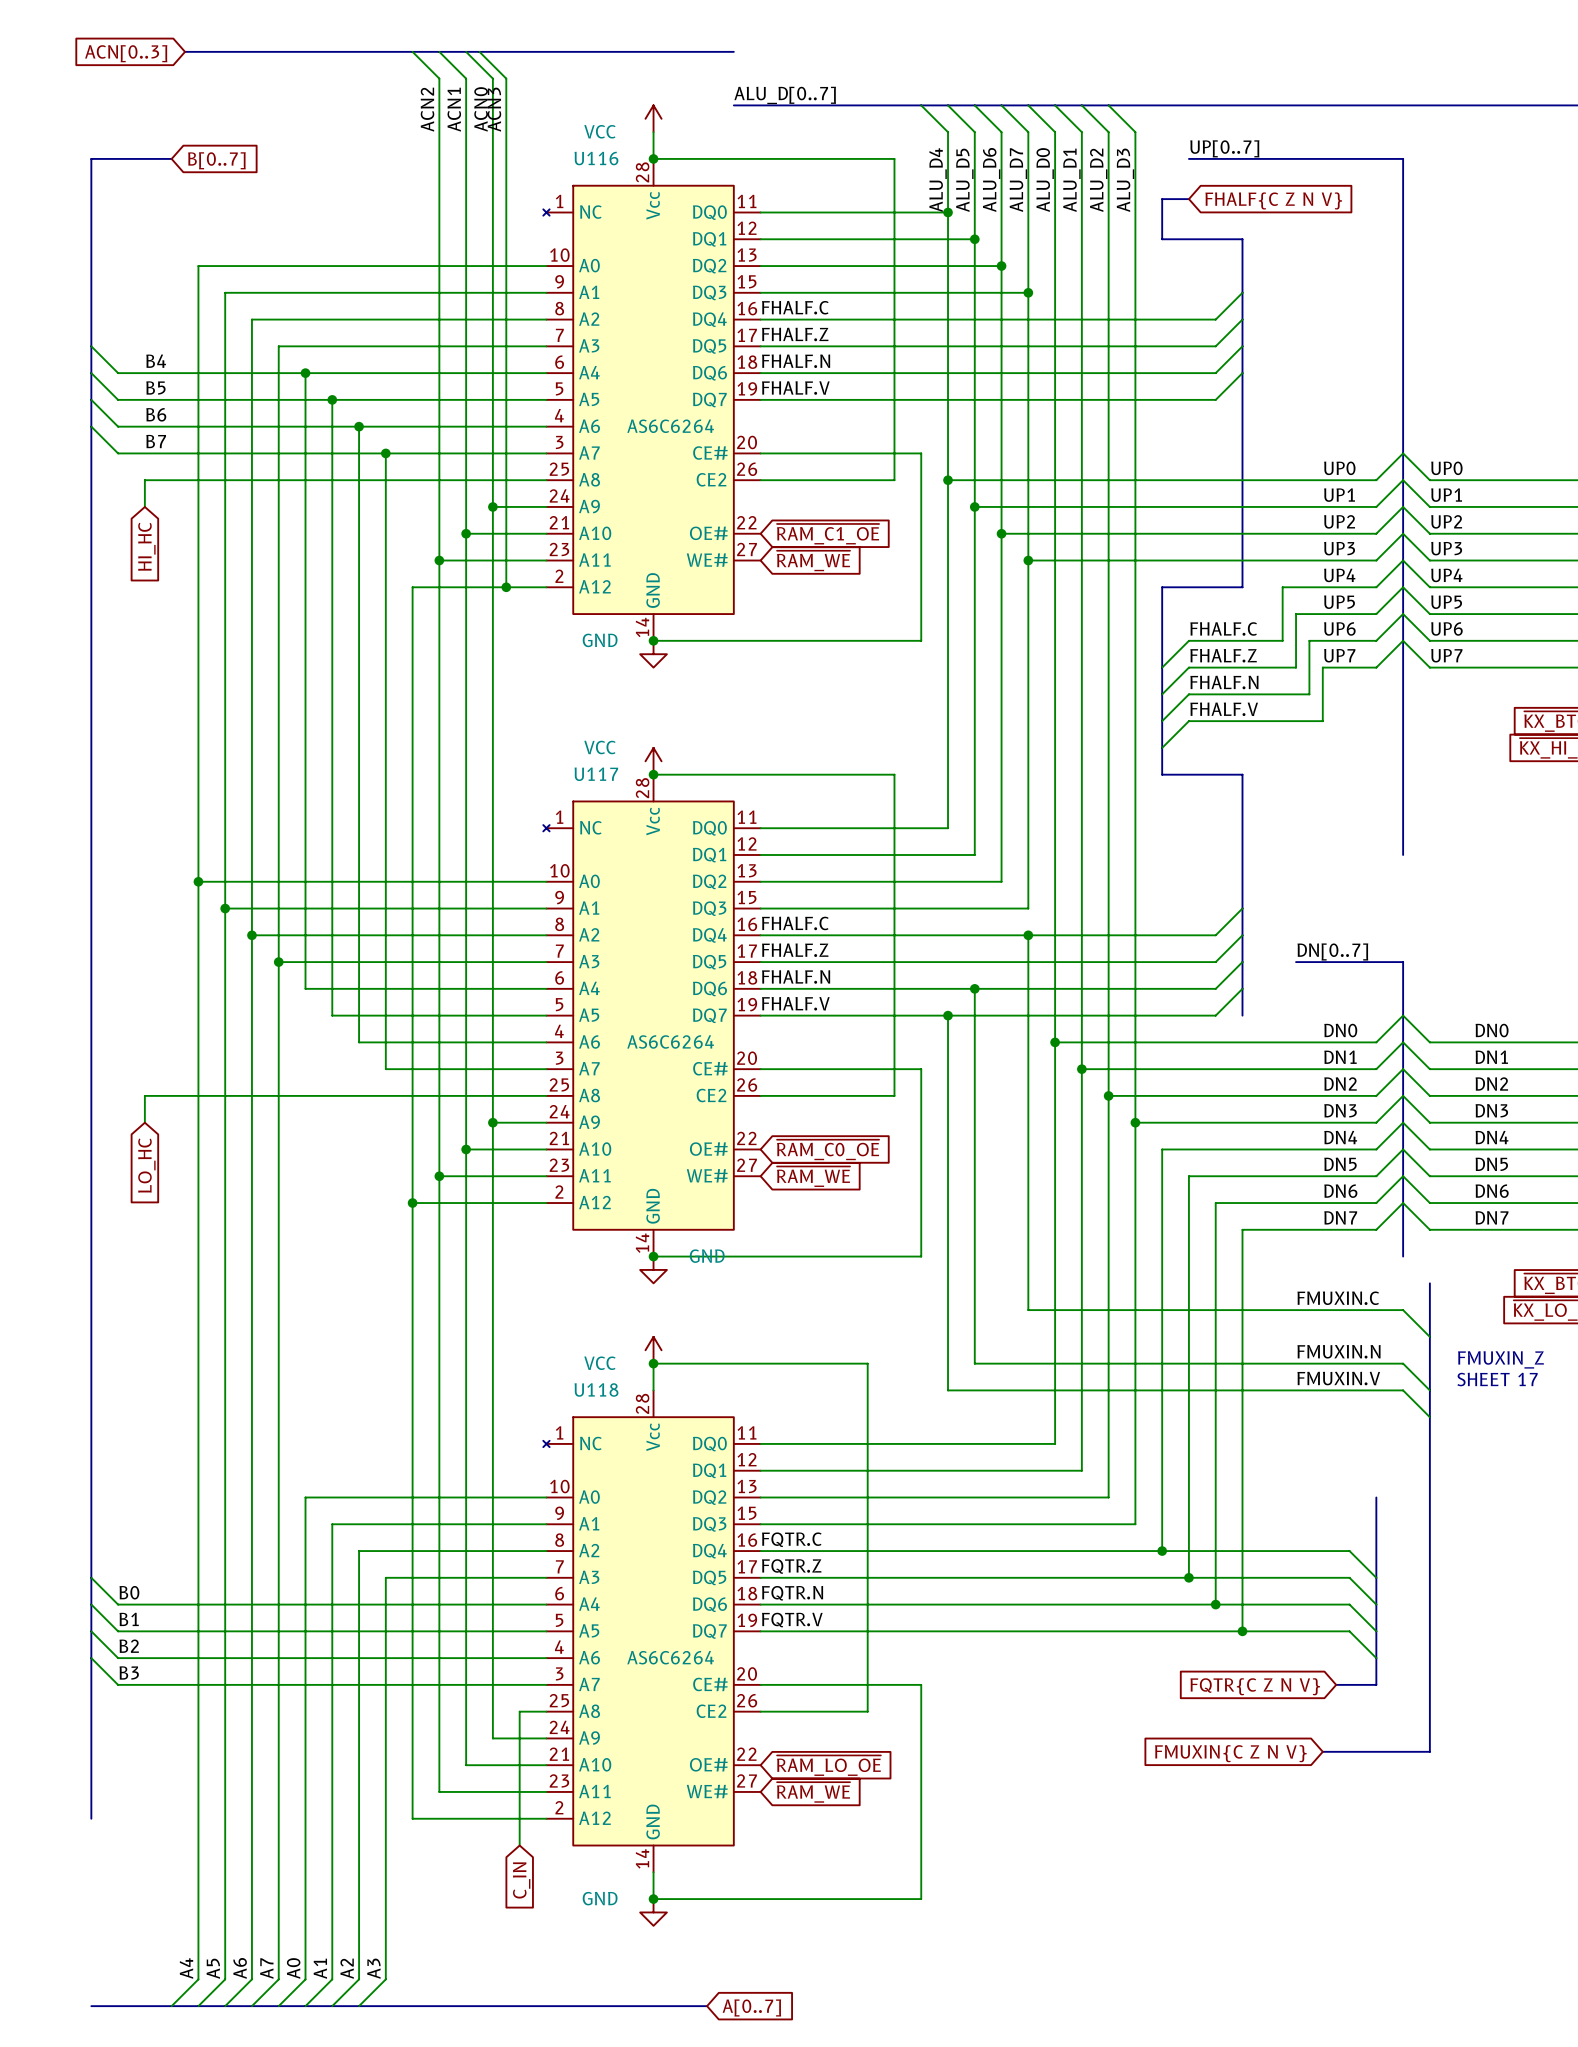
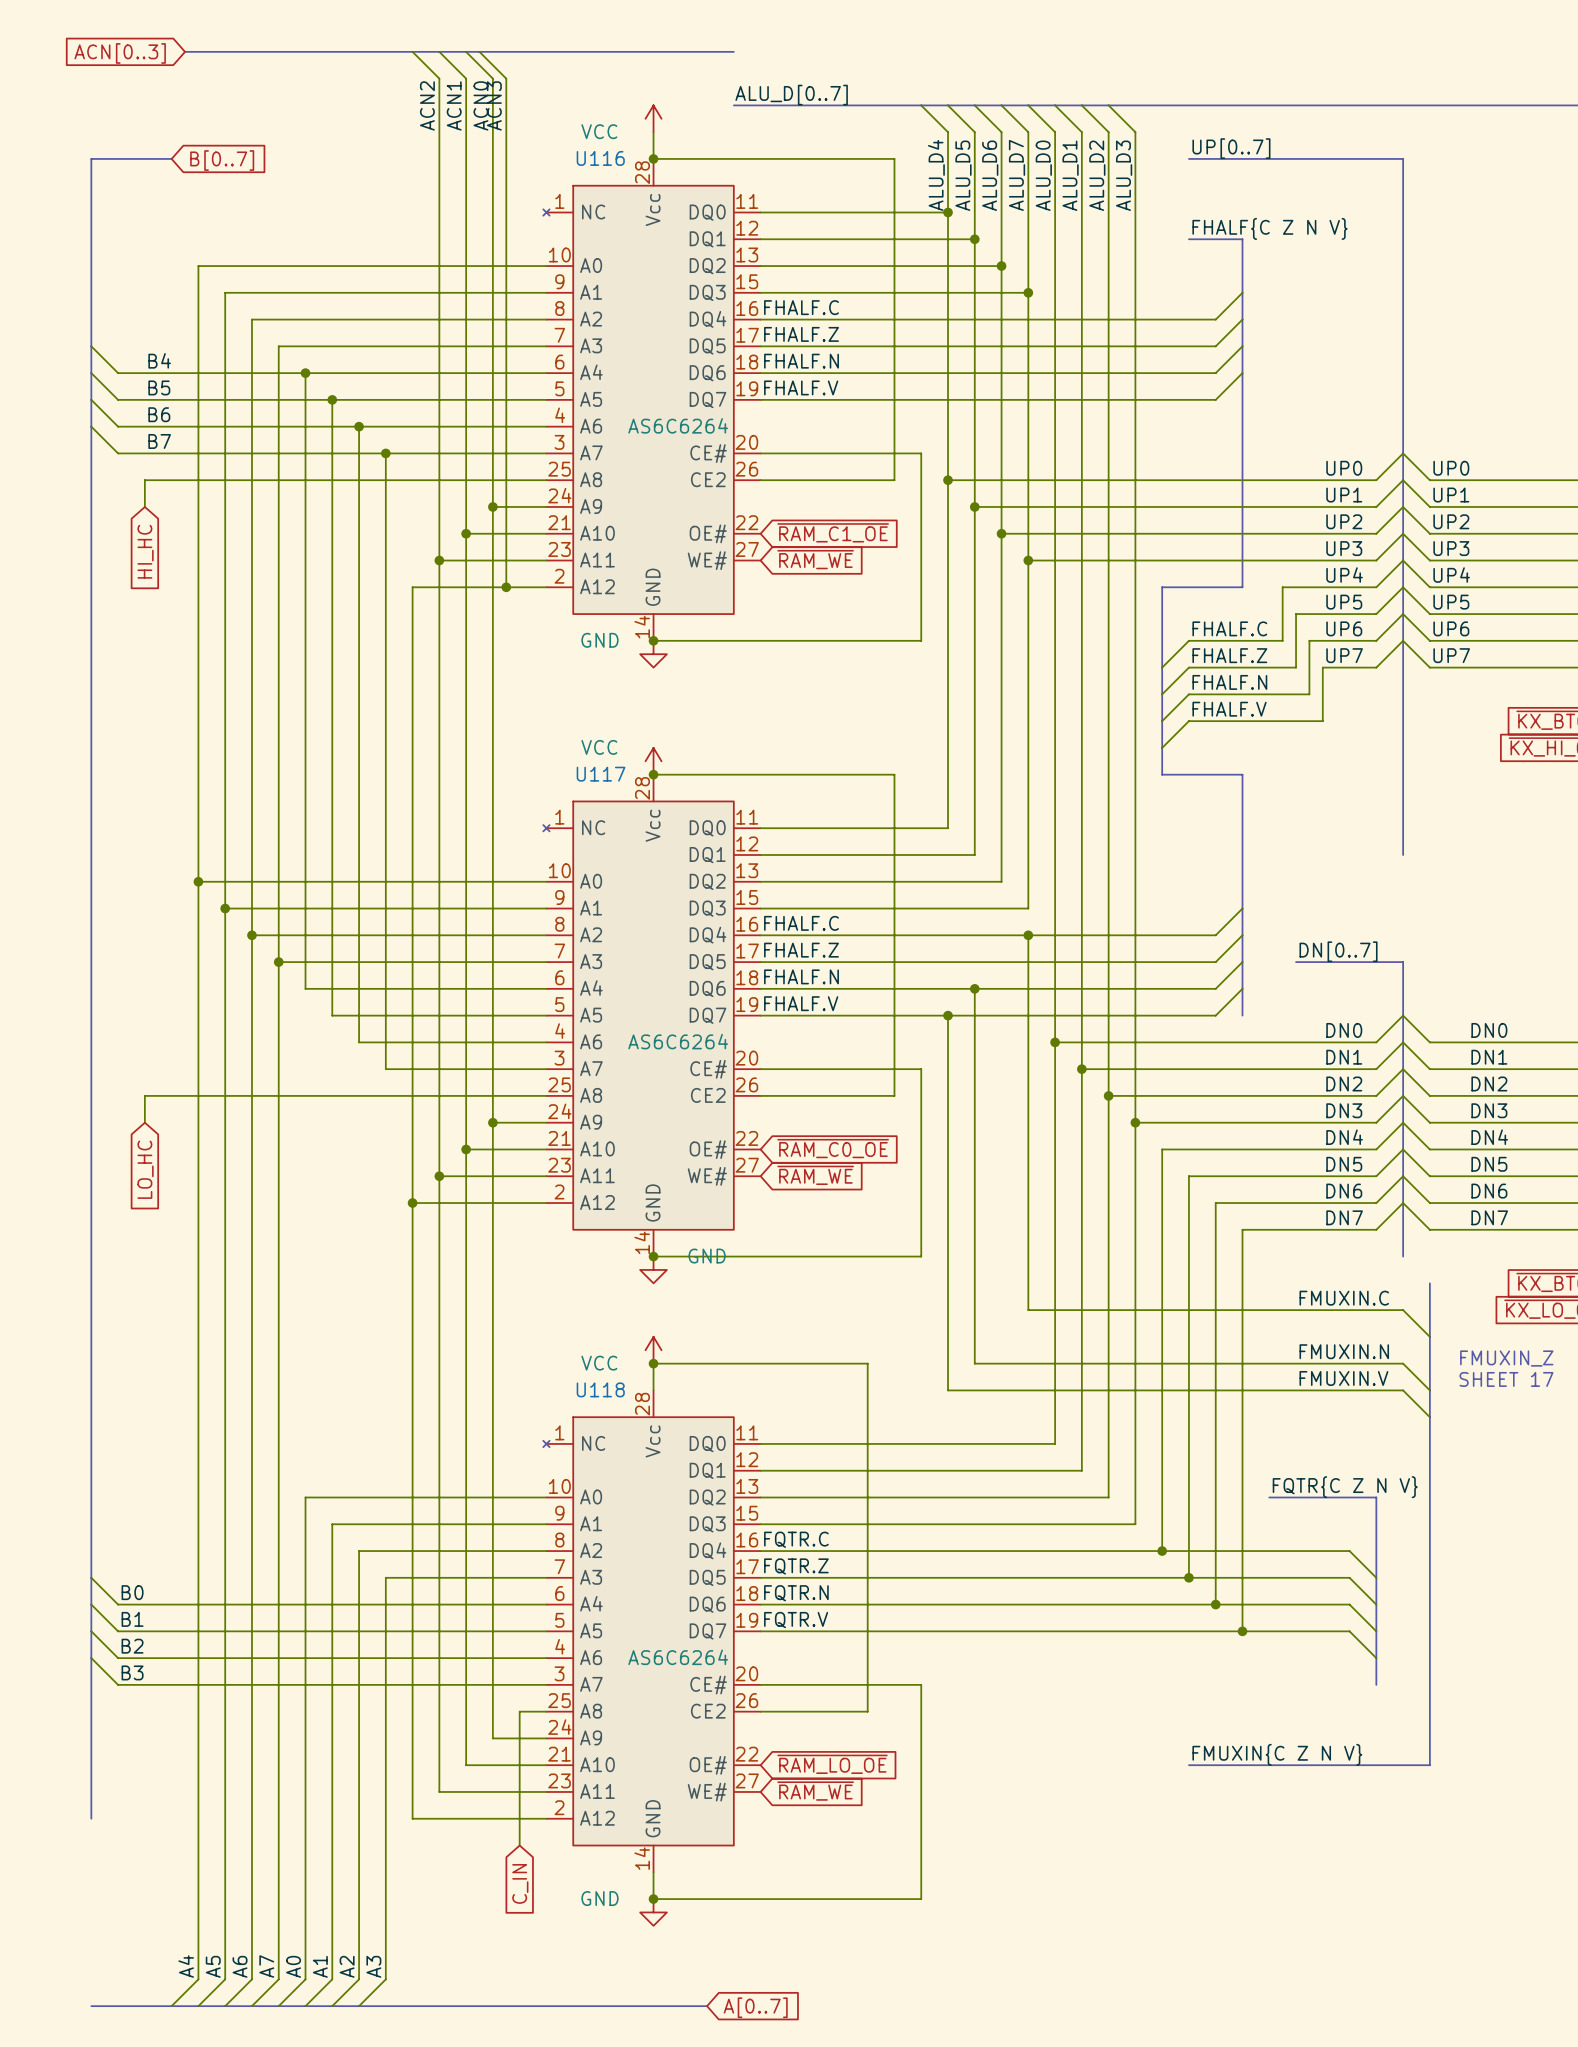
bus: (1188, 199) (1162, 199) (1162, 239) (1188, 239) -> none
global label: FHALF{C Z N V} (1273, 200) -> none
label: none -> FHALF{C Z N V} (1270, 228)
label: none -> FQTR{C Z N V} (1345, 1487)
bus: none -> (1269, 1497) (1376, 1497)
bus: (1336, 1684) (1376, 1684) -> none
global label: FQTR{C Z N V} (1255, 1686) -> none
bus: (1322, 1751) (1429, 1751) -> (1188, 1765) (1429, 1765) (1429, 1751)
global label: FMUXIN{C Z N V} (1230, 1753) -> none
label: none -> FMUXIN{C Z N V} (1277, 1754)

